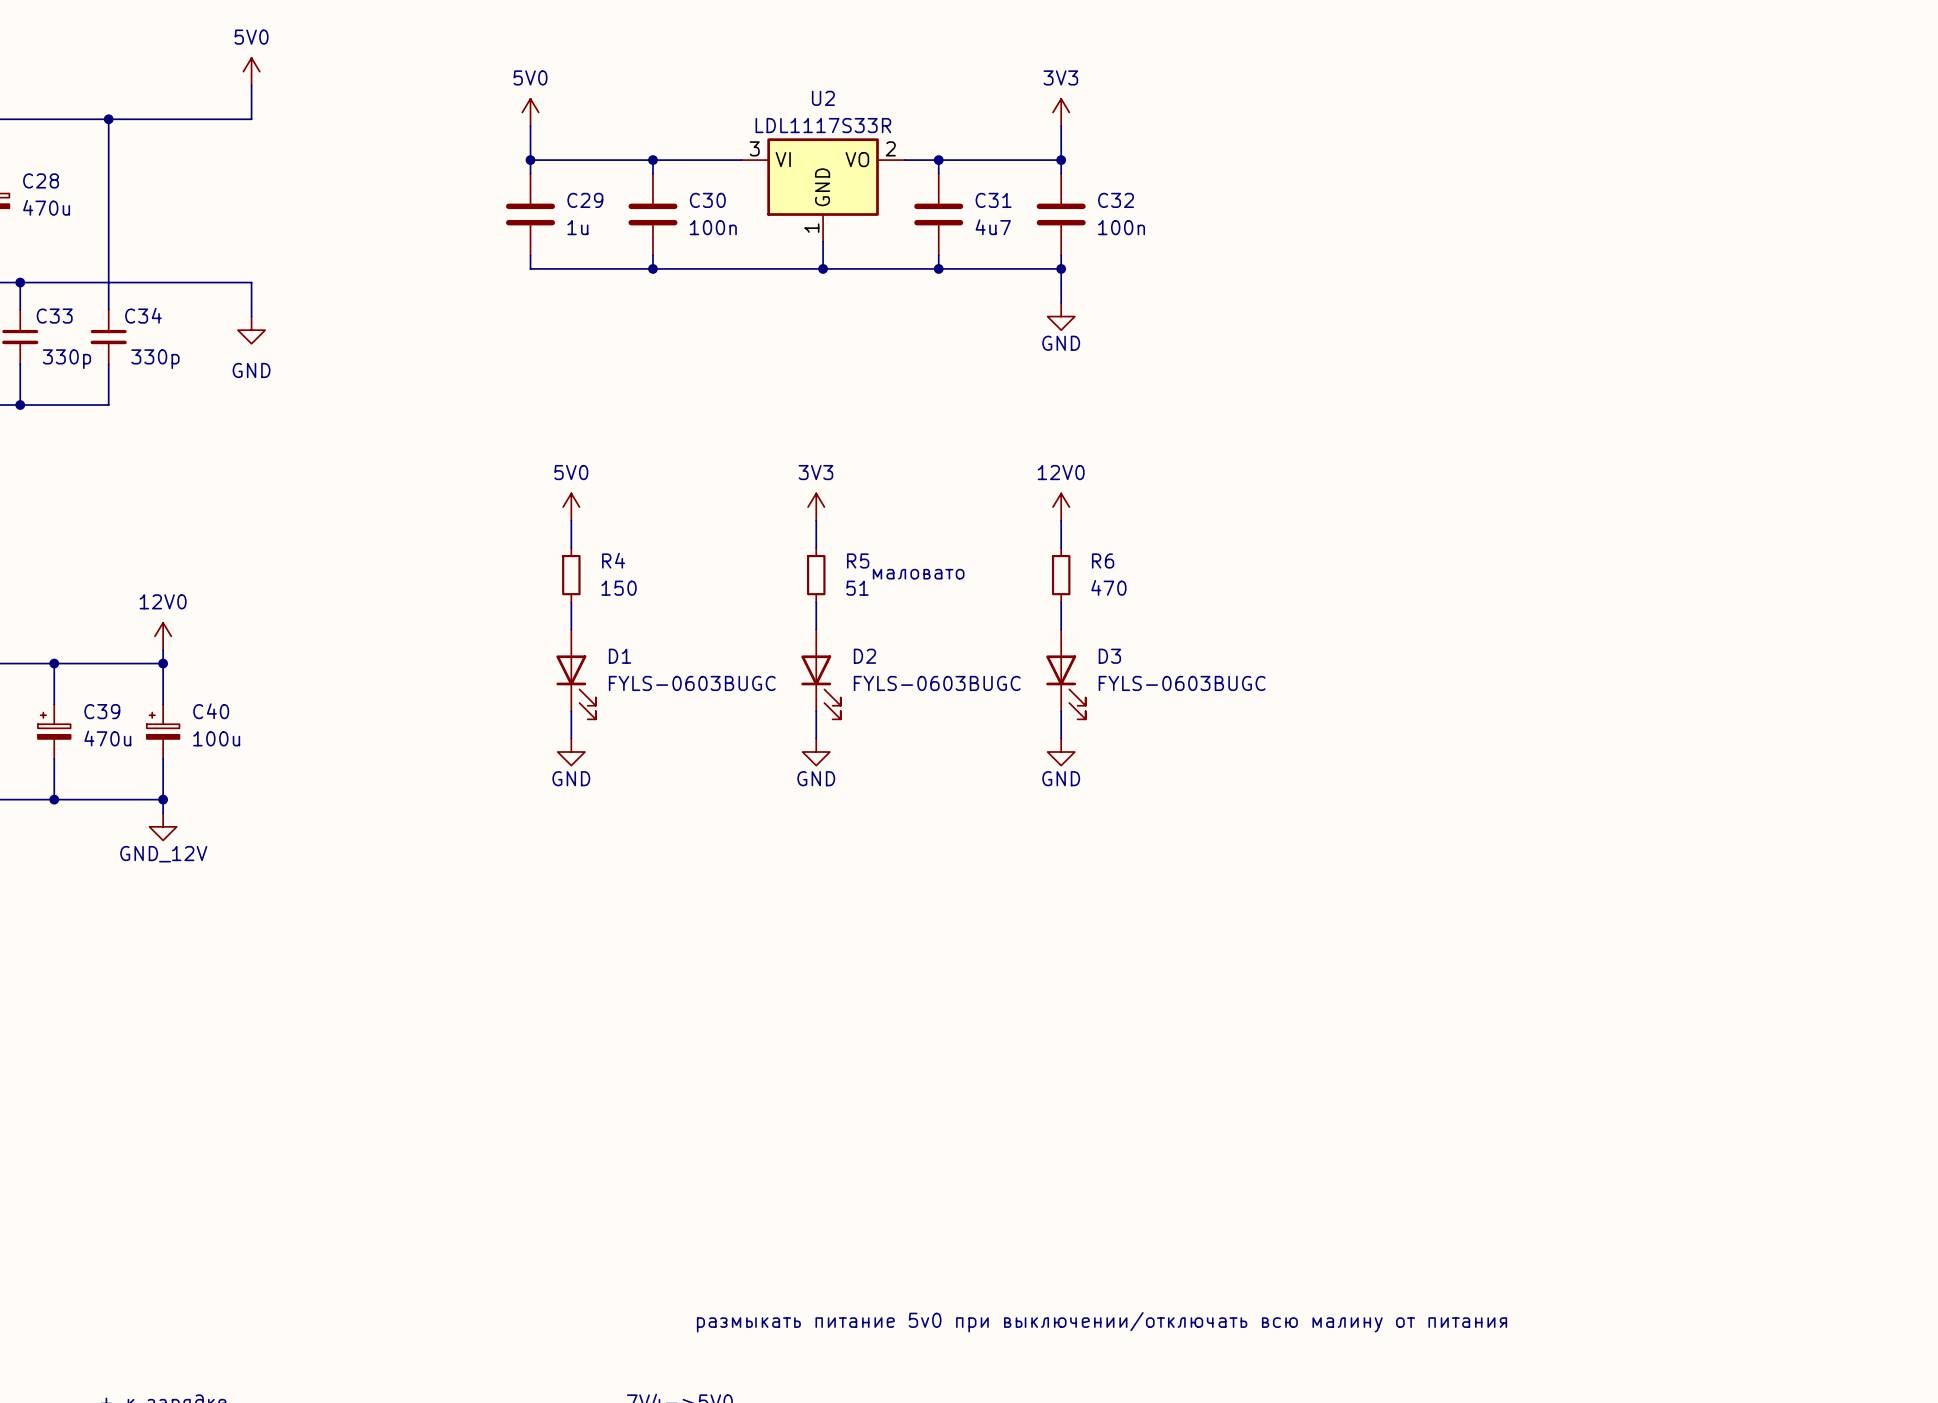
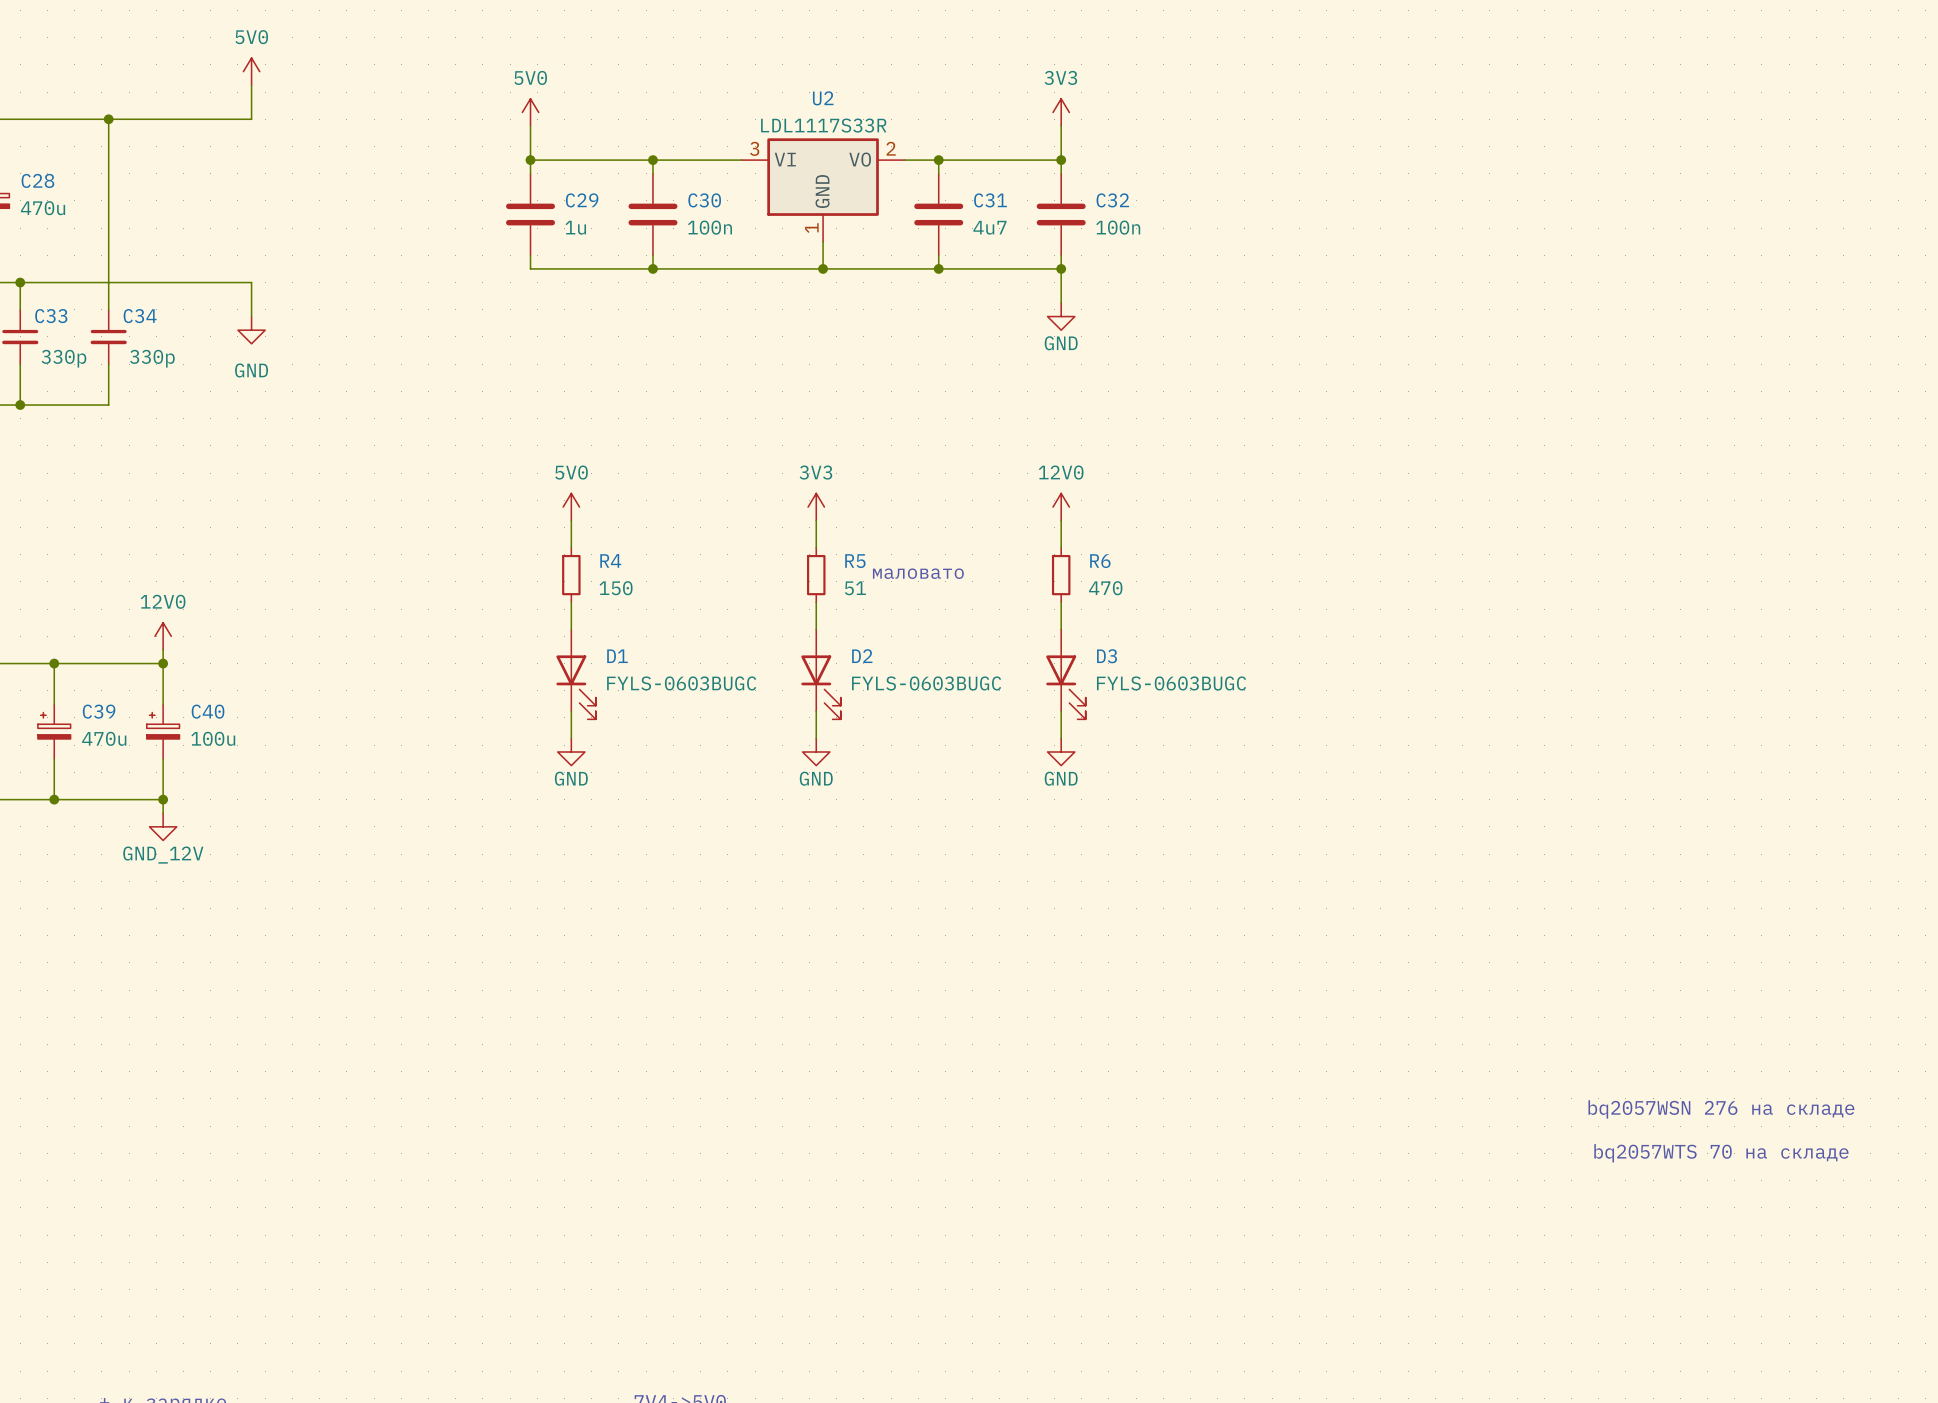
text: none -> bq2057WSN 276 на складе (1721, 1109)
text: none -> bq2057WTS 70 на складе (1721, 1153)
text: размыкать питание 5v0 при выключении/отключать всю малину от питания (1102, 1322) -> none

